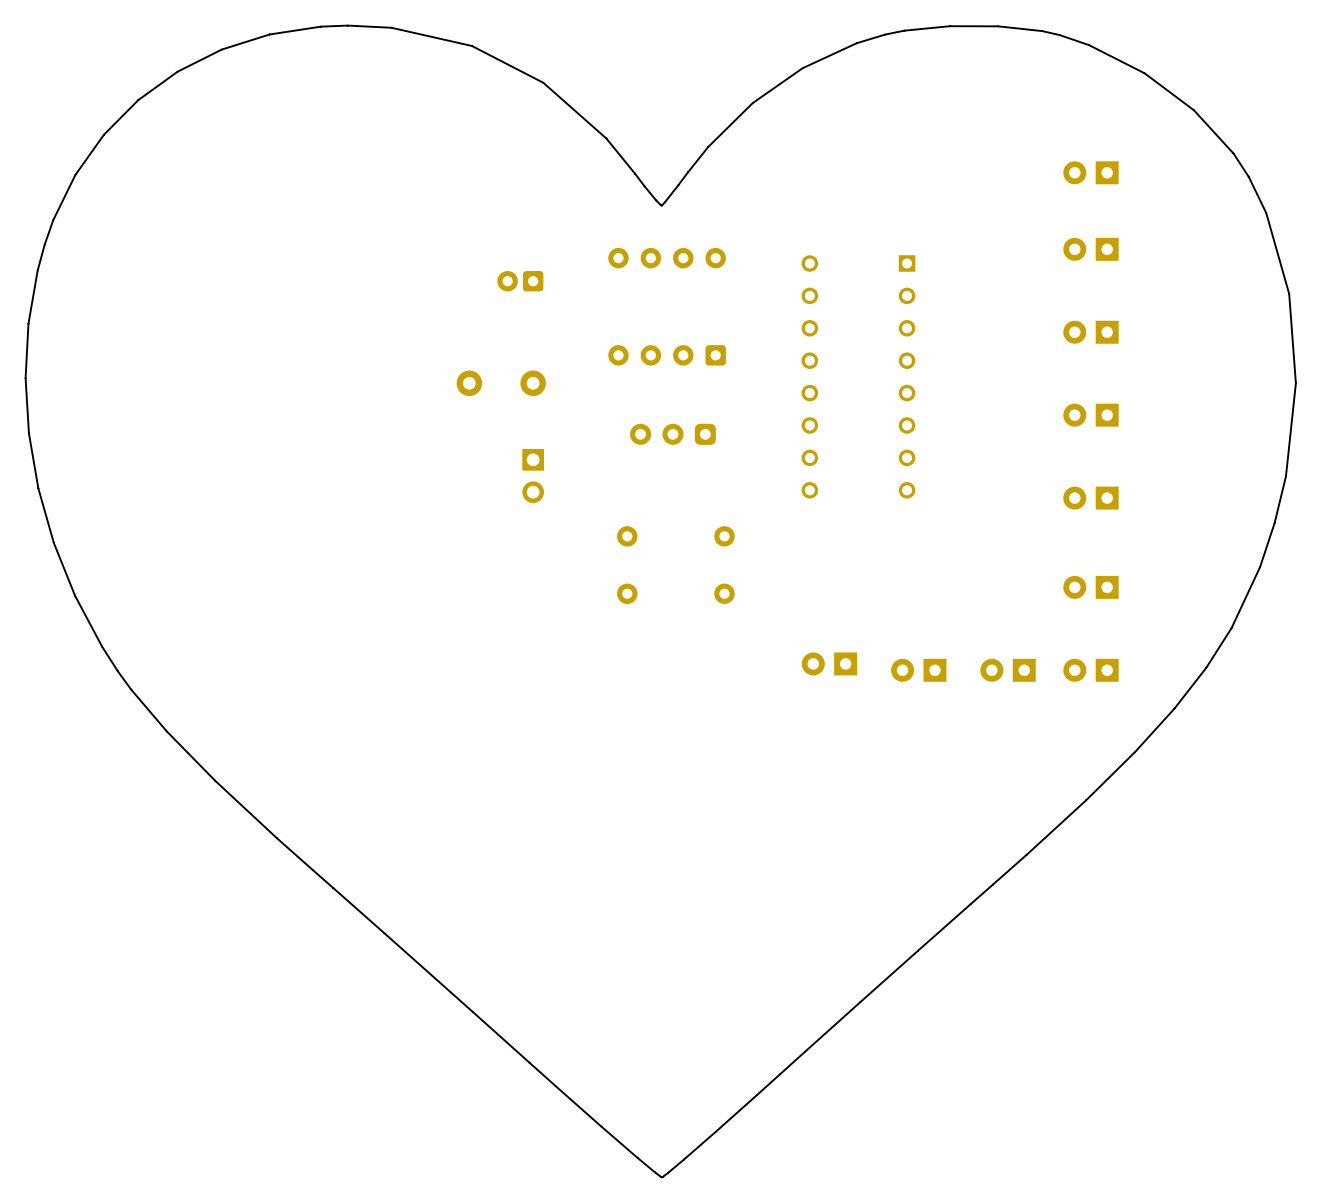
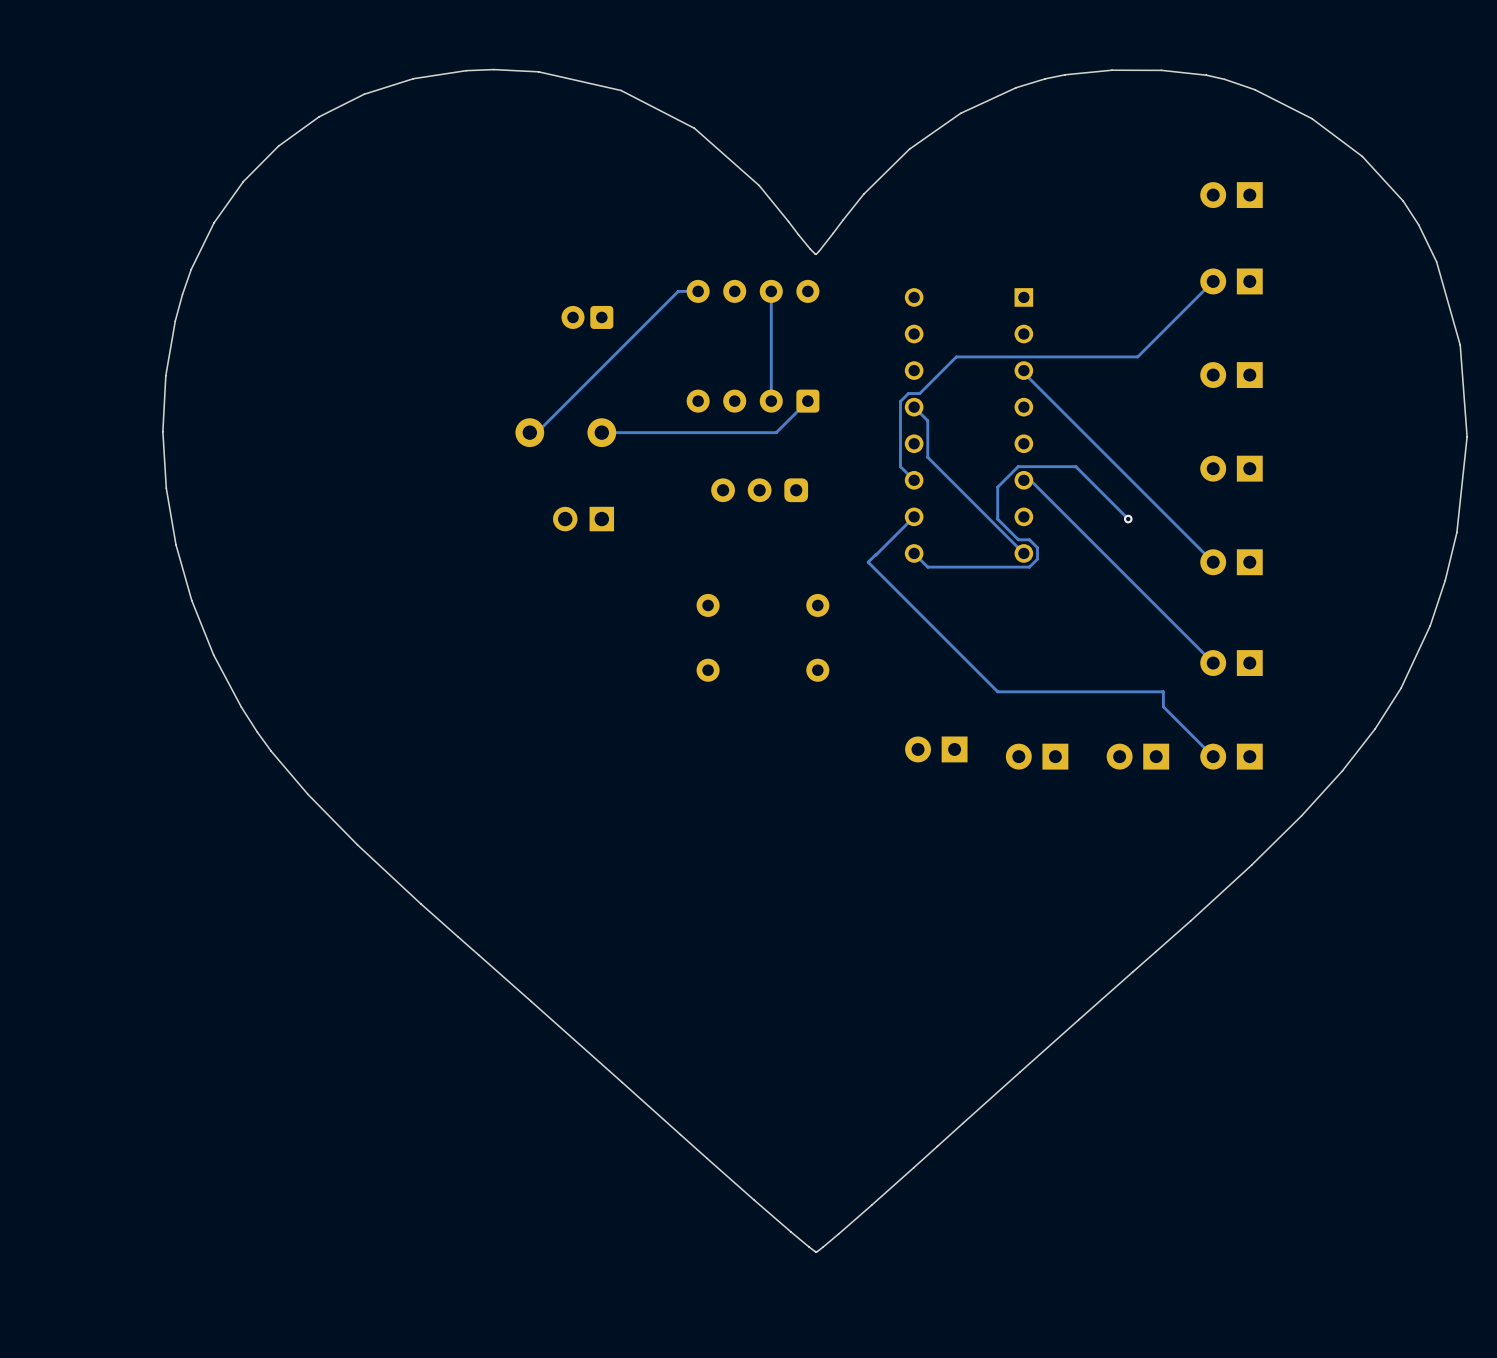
board edge: (347, 25) (391, 27) (471, 45) (543, 82) (606, 138) (661, 205) (708, 147) (752, 103) (802, 68) (856, 43) (904, 30) (950, 26) (998, 26) (1042, 31) (1059, 35) (1089, 45) (1144, 73) (1193, 110) (1233, 153) (1248, 176) (1266, 212) (1289, 293) (1295, 383) (1285, 476) (1274, 523) (1260, 567) (1231, 628) (1206, 667) (1174, 708) (1134, 752) (1086, 800) (715, 1131) (661, 1177) (601, 1126) (276, 838) (215, 780) (166, 731) (117, 671) (102, 646) (75, 595) (53, 542) (38, 488) (28, 433) (25, 378) (28, 323) (37, 270) (44, 244) (53, 220) (75, 174) (104, 134) (138, 100) (177, 71) (221, 49) (269, 34) (321, 26) (347, 25) -> (493, 69) (538, 71) (621, 90) (694, 128) (759, 185) (816, 254) (863, 194) (909, 149) (960, 113) (1016, 87) (1065, 74) (1111, 70) (1161, 70) (1206, 75) (1224, 79) (1254, 89) (1311, 118) (1362, 156) (1403, 200) (1418, 224) (1436, 261) (1460, 345) (1467, 436) (1456, 532) (1445, 580) (1430, 625) (1401, 688) (1375, 728) (1342, 770) (1301, 815) (1251, 865) (871, 1205) (816, 1252) (754, 1200) (420, 903) (357, 844) (307, 794) (257, 732) (241, 707) (213, 654) (191, 600) (175, 544) (166, 488) (162, 431) (165, 375) (175, 321) (182, 294) (191, 269) (214, 222) (243, 181) (278, 146) (319, 116) (364, 94) (413, 78) (466, 70) (493, 69)
track: none -> (1213, 281) (1137, 356) (956, 356) (919, 393) (908, 393) (900, 401) (900, 466) (914, 480)
track: none -> (698, 291) (678, 291) (537, 432)
track: none -> (771, 291) (771, 401)
track: none -> (1023, 370) (1023, 372) (1213, 562)
track: none -> (807, 401) (776, 432) (609, 432)
track: none -> (914, 407) (927, 420) (927, 457) (1023, 553)
track: none -> (1023, 480) (1030, 480) (1213, 663)
track: none -> (914, 516) (868, 562) (997, 691) (1163, 691) (1163, 706) (1213, 756)
track: none -> (1128, 519) (1075, 466) (1018, 466) (997, 487) (997, 519) (1018, 539) (1029, 539) (1037, 547) (1037, 559) (1029, 567) (927, 567) (914, 553)
via: none -> (1128, 519)
part rotation: 0° (533, 476) -> 90° clockwise (583, 519)

